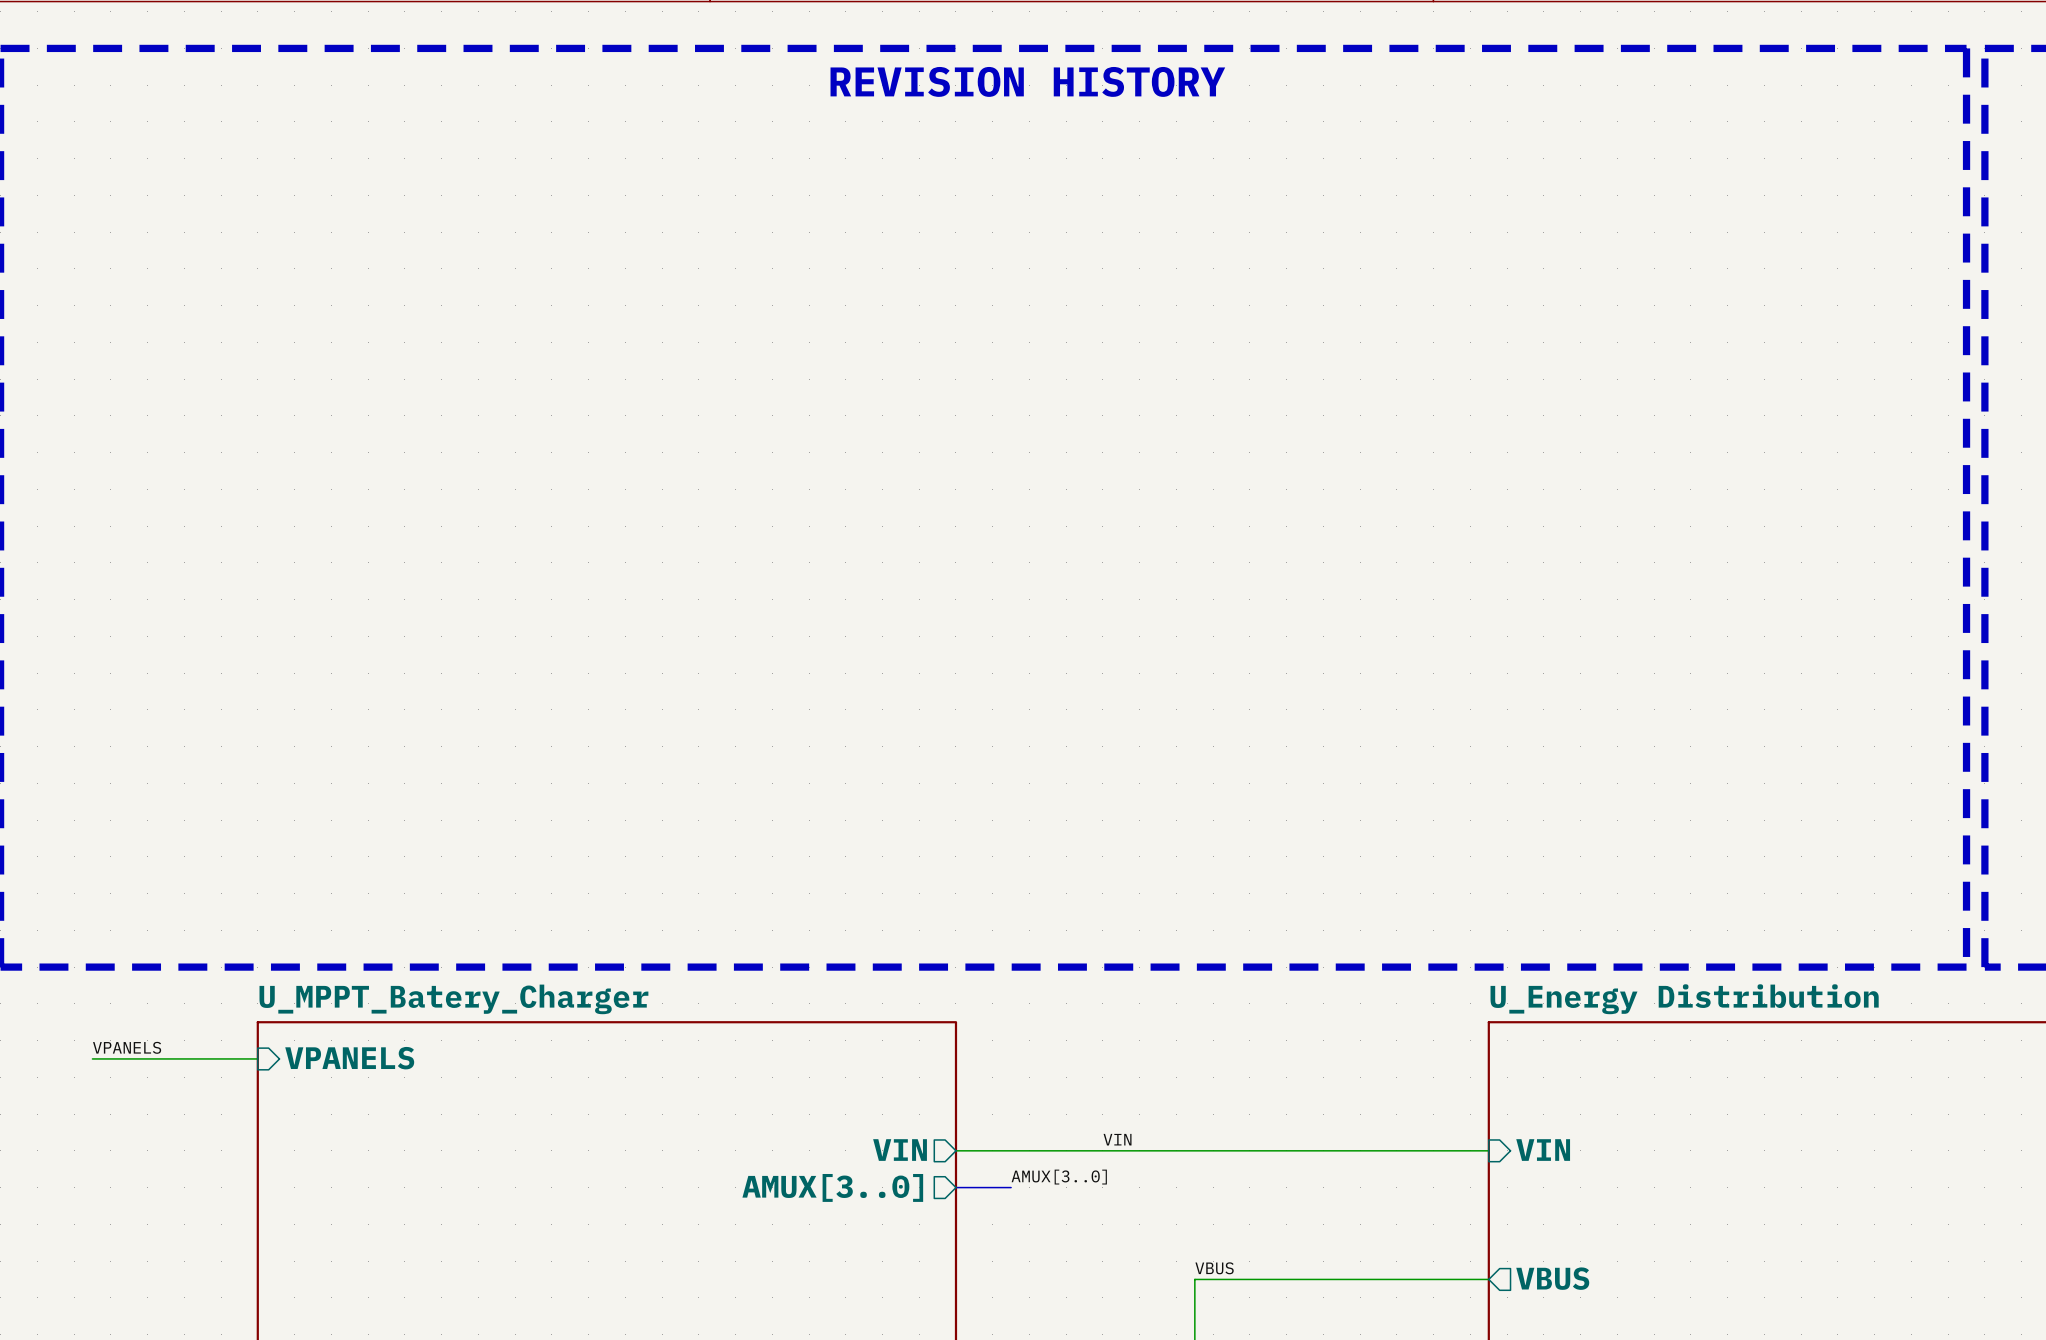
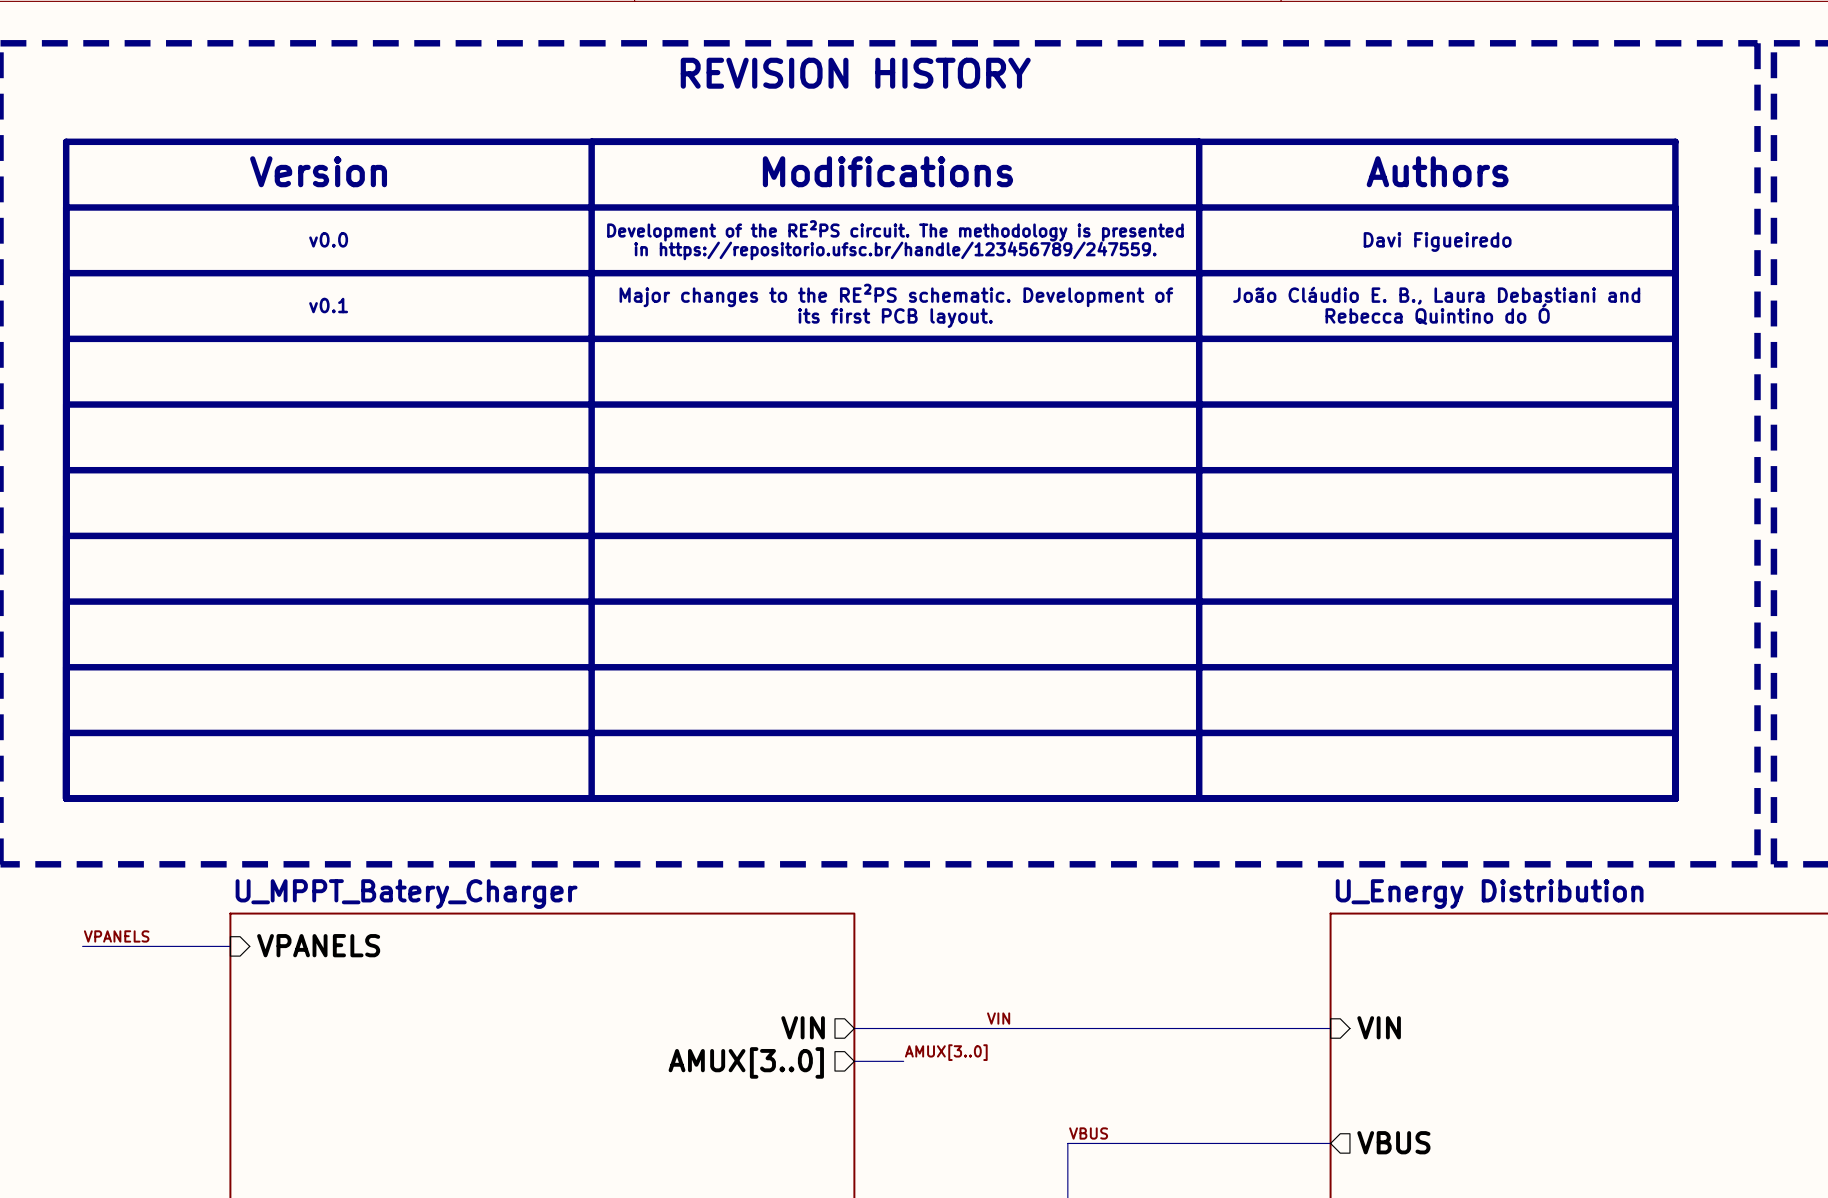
text position: REVISION HISTORY (1027, 81) -> REVISION HISTORY (855, 73)
line: none -> (66, 141) (66, 798) (1675, 798) (1675, 141) (66, 141)
line: none -> (591, 141) (591, 798)
line: none -> (1199, 141) (1199, 798)
text: none -> Version (318, 171)
text: none -> Modifications (887, 171)
text: none -> Authors (1437, 171)
line: none -> (66, 207) (1675, 207)
text: none -> Development of the RE²PS circuit. The methodology is presented (895, 230)
text: none -> v0.0 (328, 239)
text: none -> Davi Figueiredo (1437, 242)
text: none -> in https://repositorio.ufsc.br/handle/123456789/247559. (895, 250)
line: none -> (66, 273) (1675, 273)
text: none -> João Cláudio E. B., Laura Debastiani and (1436, 295)
text: none -> Major changes to the RE²PS schematic. Development of (896, 295)
text: none -> v0.1 (328, 305)
text: none -> Rebecca Quintino do Ó (1437, 314)
text: none -> its first PCB layout. (895, 318)
line: none -> (66, 338) (1675, 338)
line: none -> (66, 404) (1675, 404)
line: none -> (66, 470) (1675, 470)
line: none -> (66, 535) (1675, 535)
line: none -> (66, 601) (1675, 601)
line: none -> (66, 667) (1675, 667)
line: none -> (66, 732) (1675, 732)

